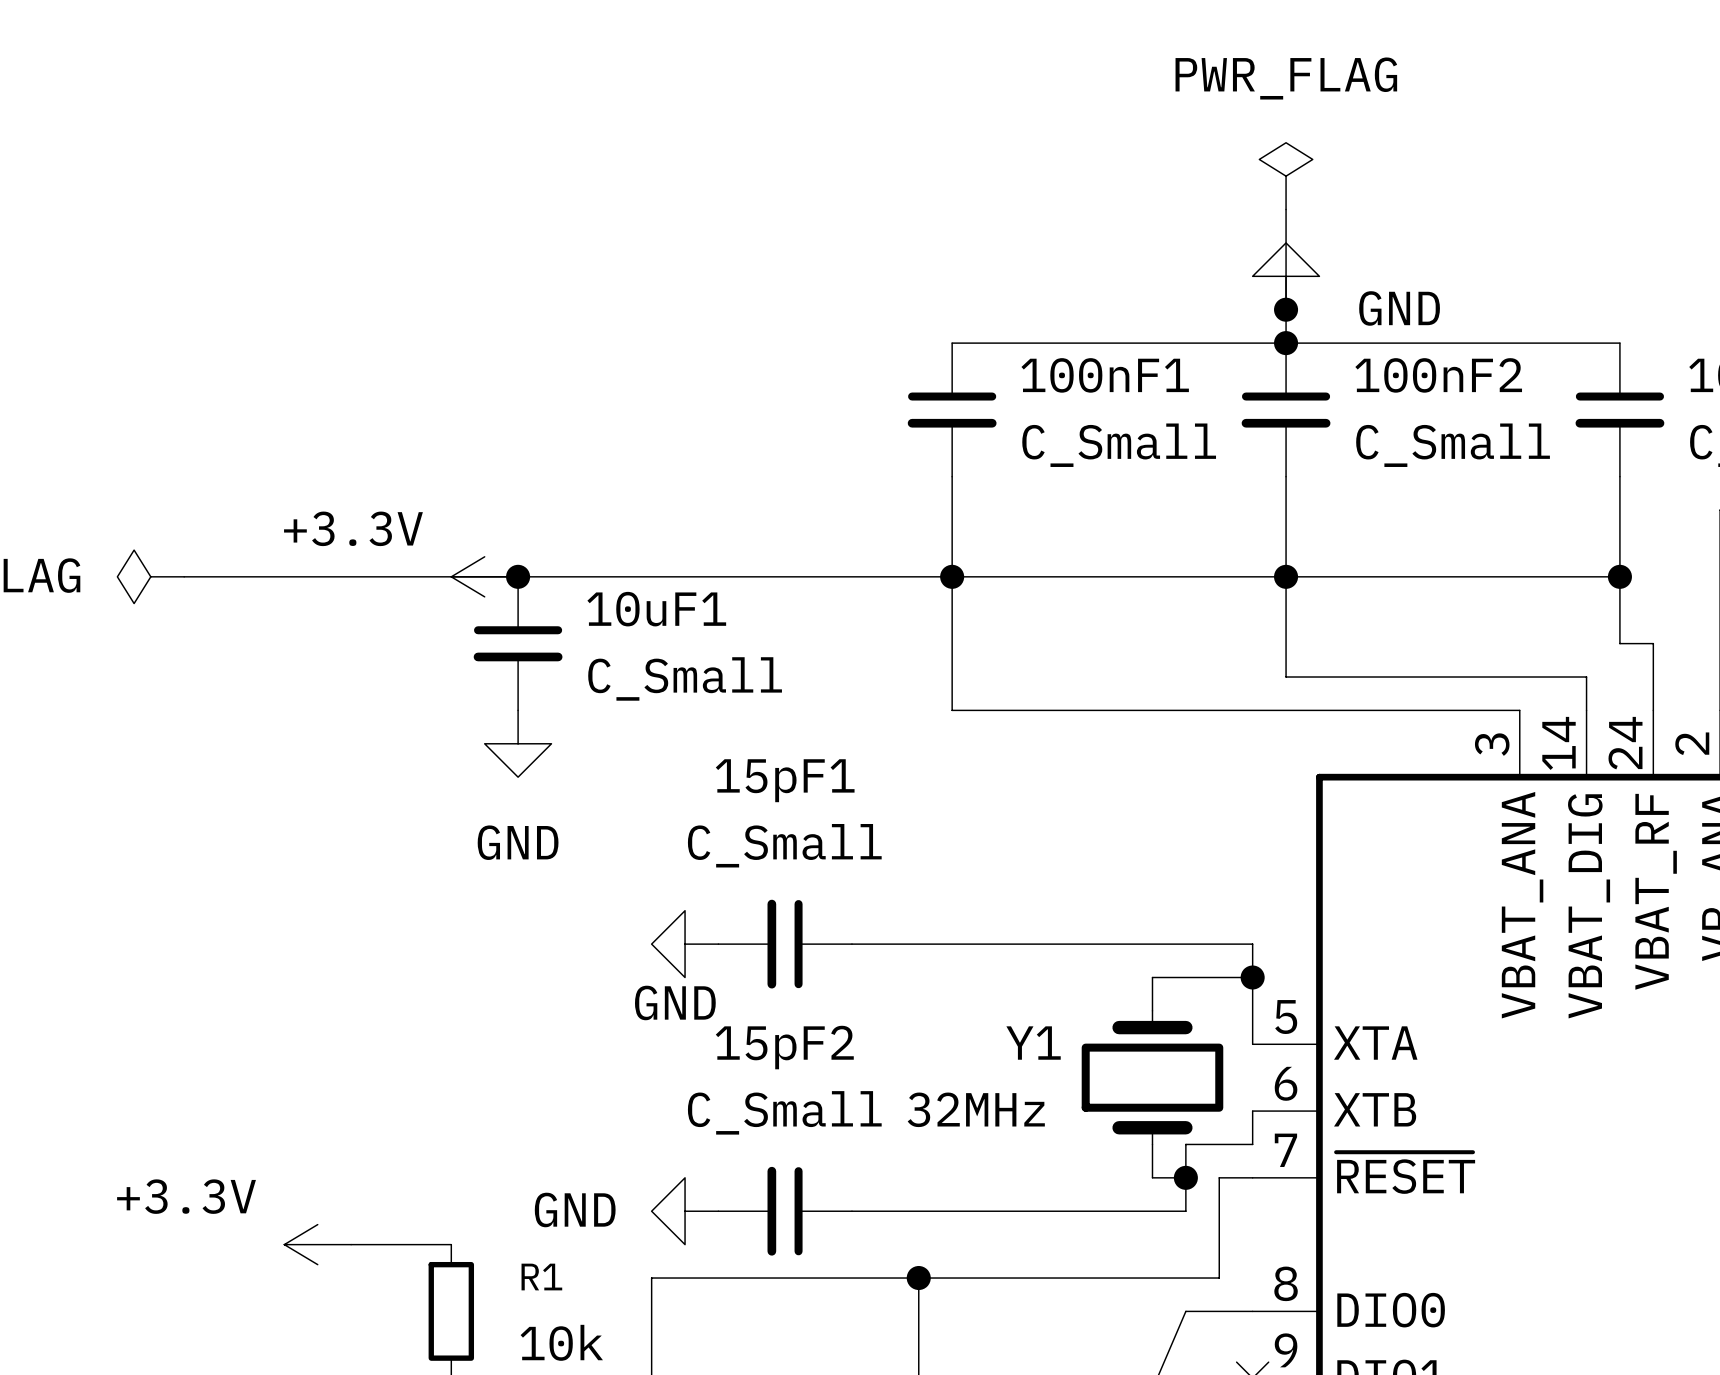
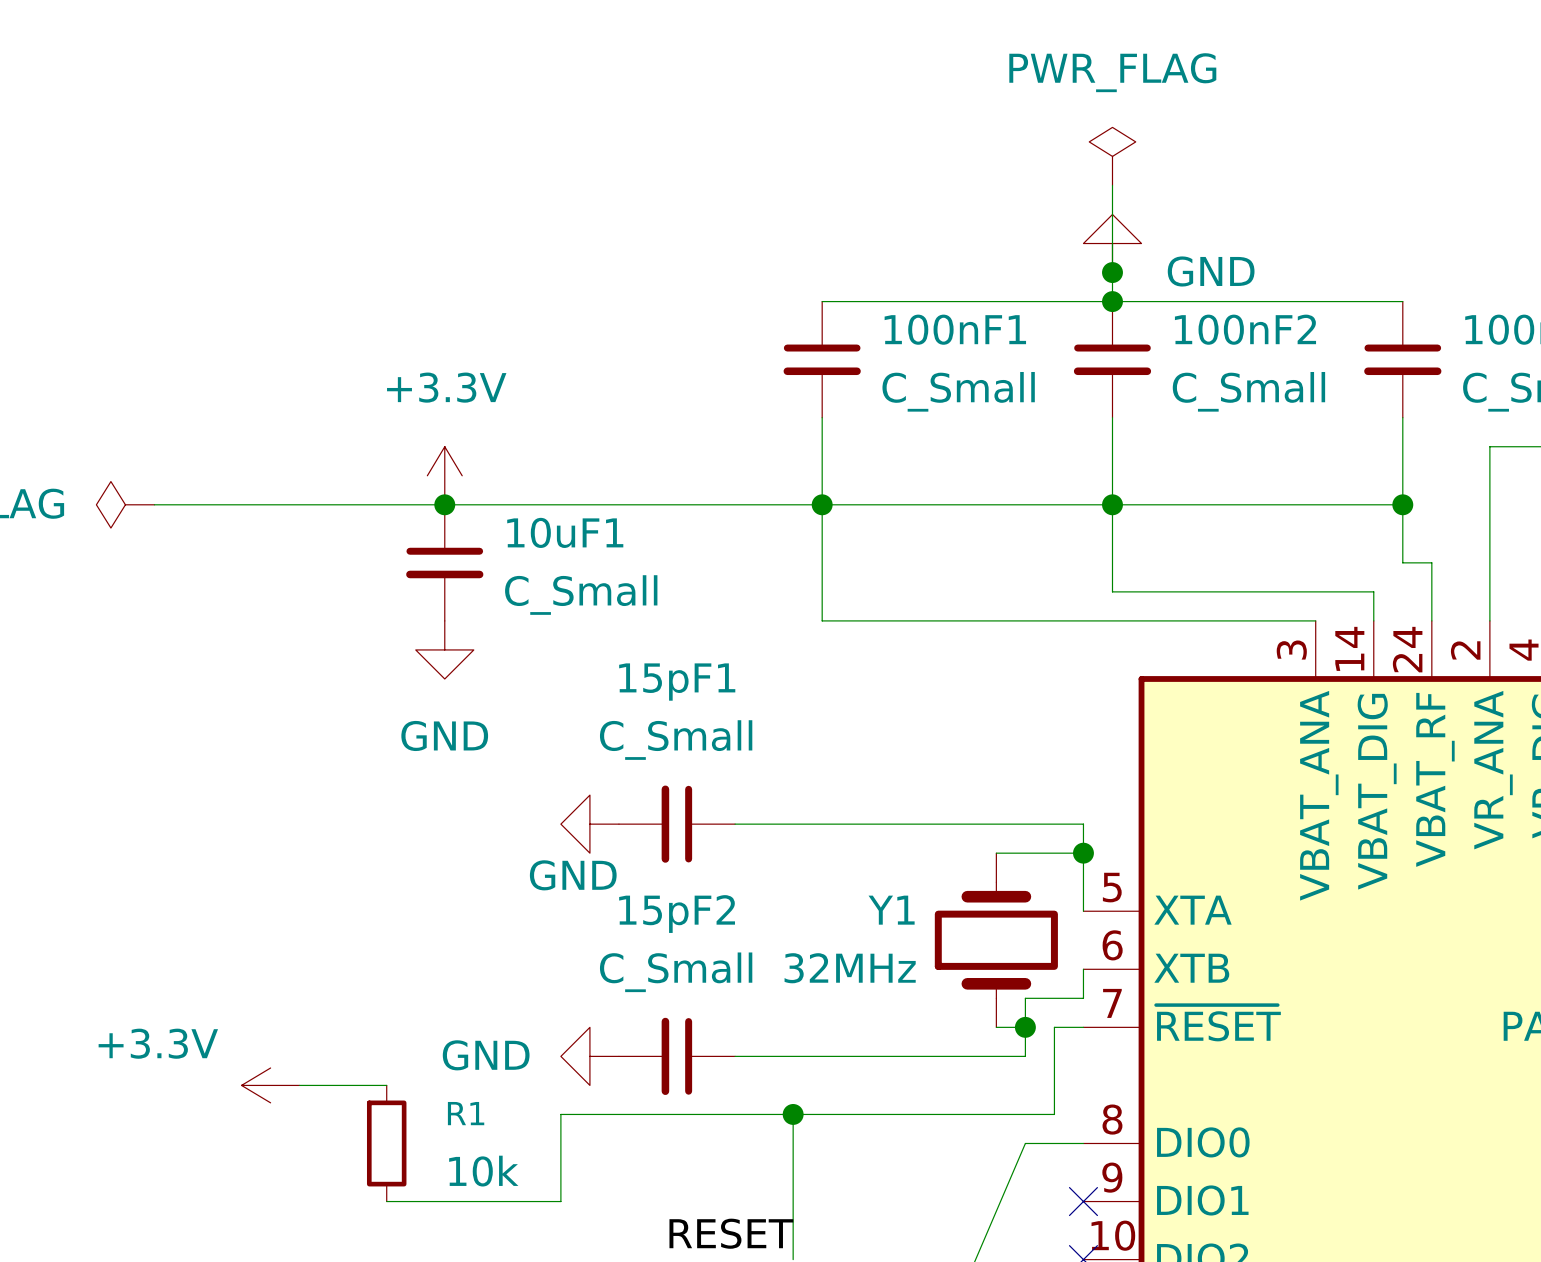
power symbol text position: +3.3V (353, 528) -> +3.3V (446, 387)
power symbol rotation: 0° (484, 576) -> 90° clockwise (444, 475)
power symbol position: +3.3V (484, 576) -> +3.3V (444, 475)

